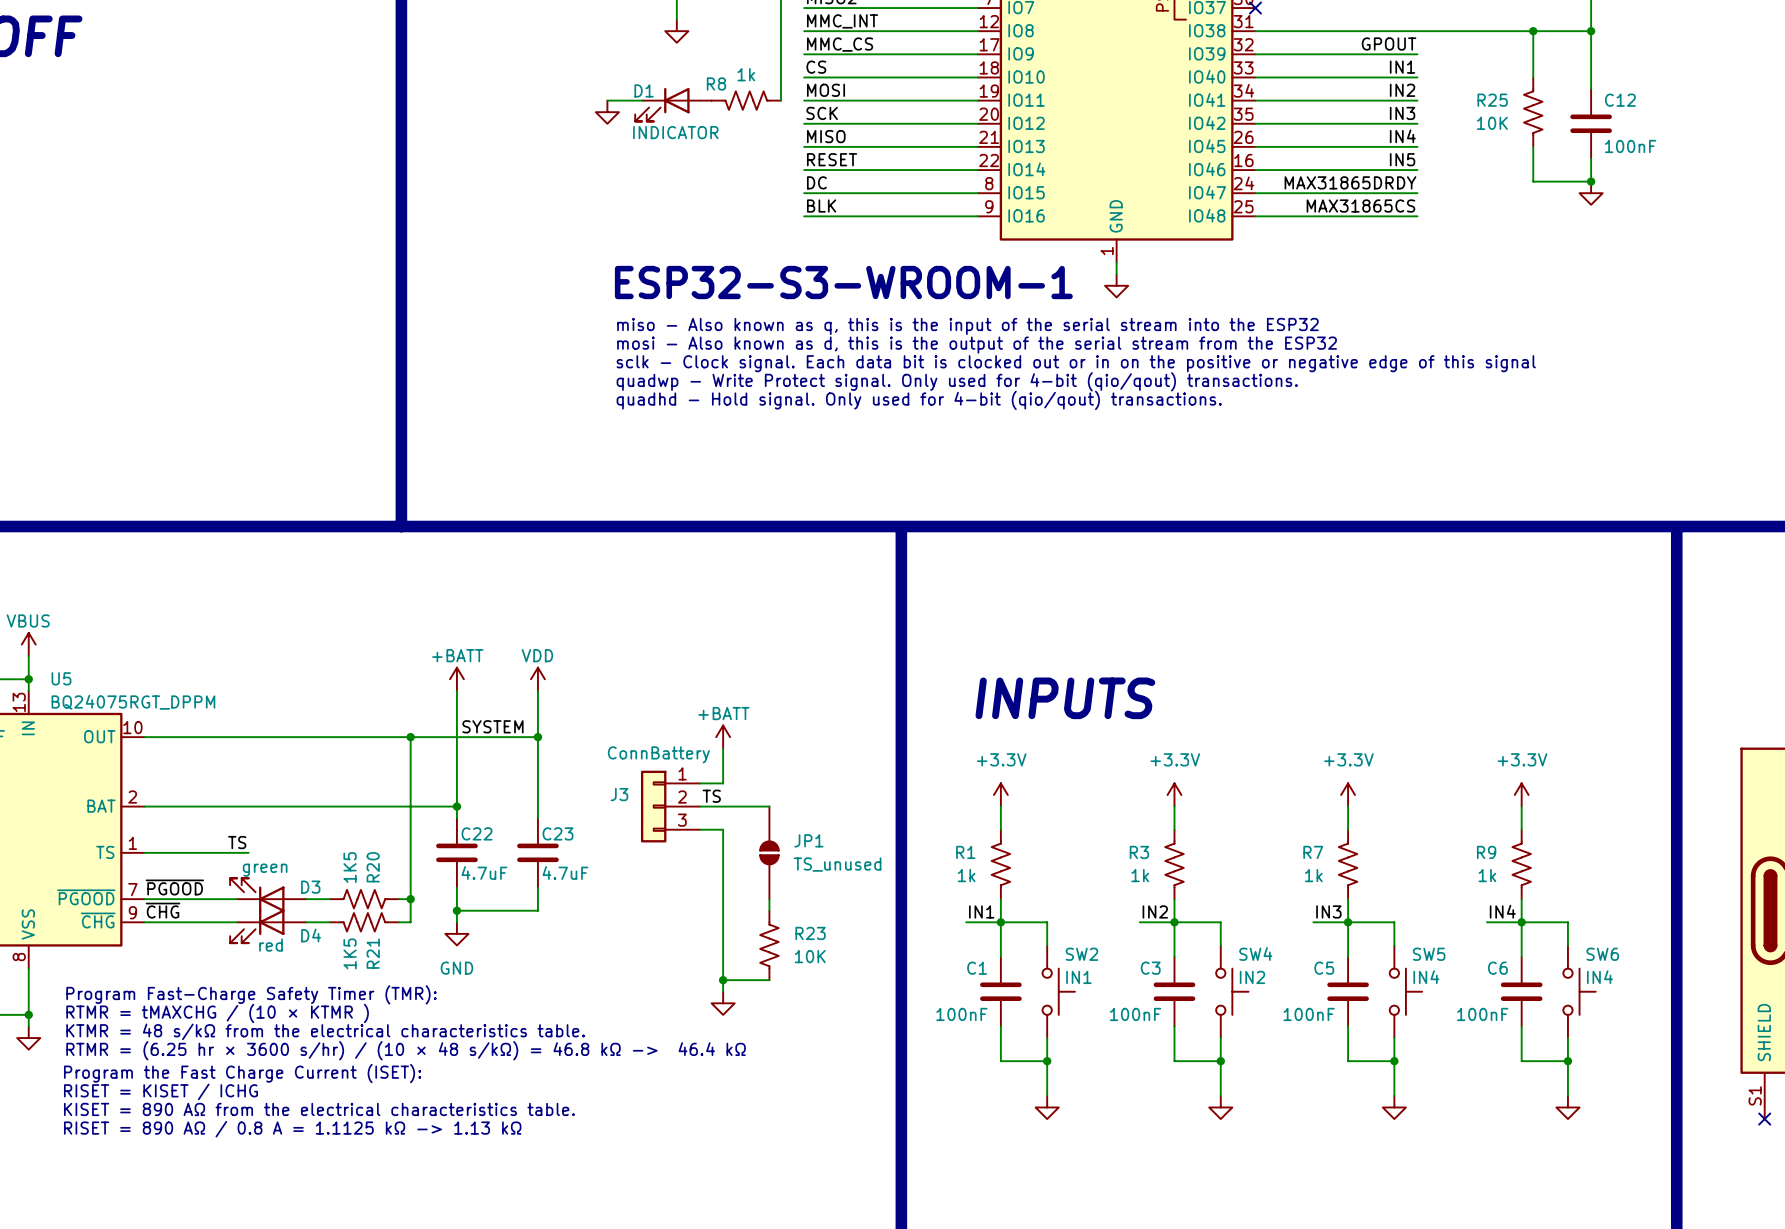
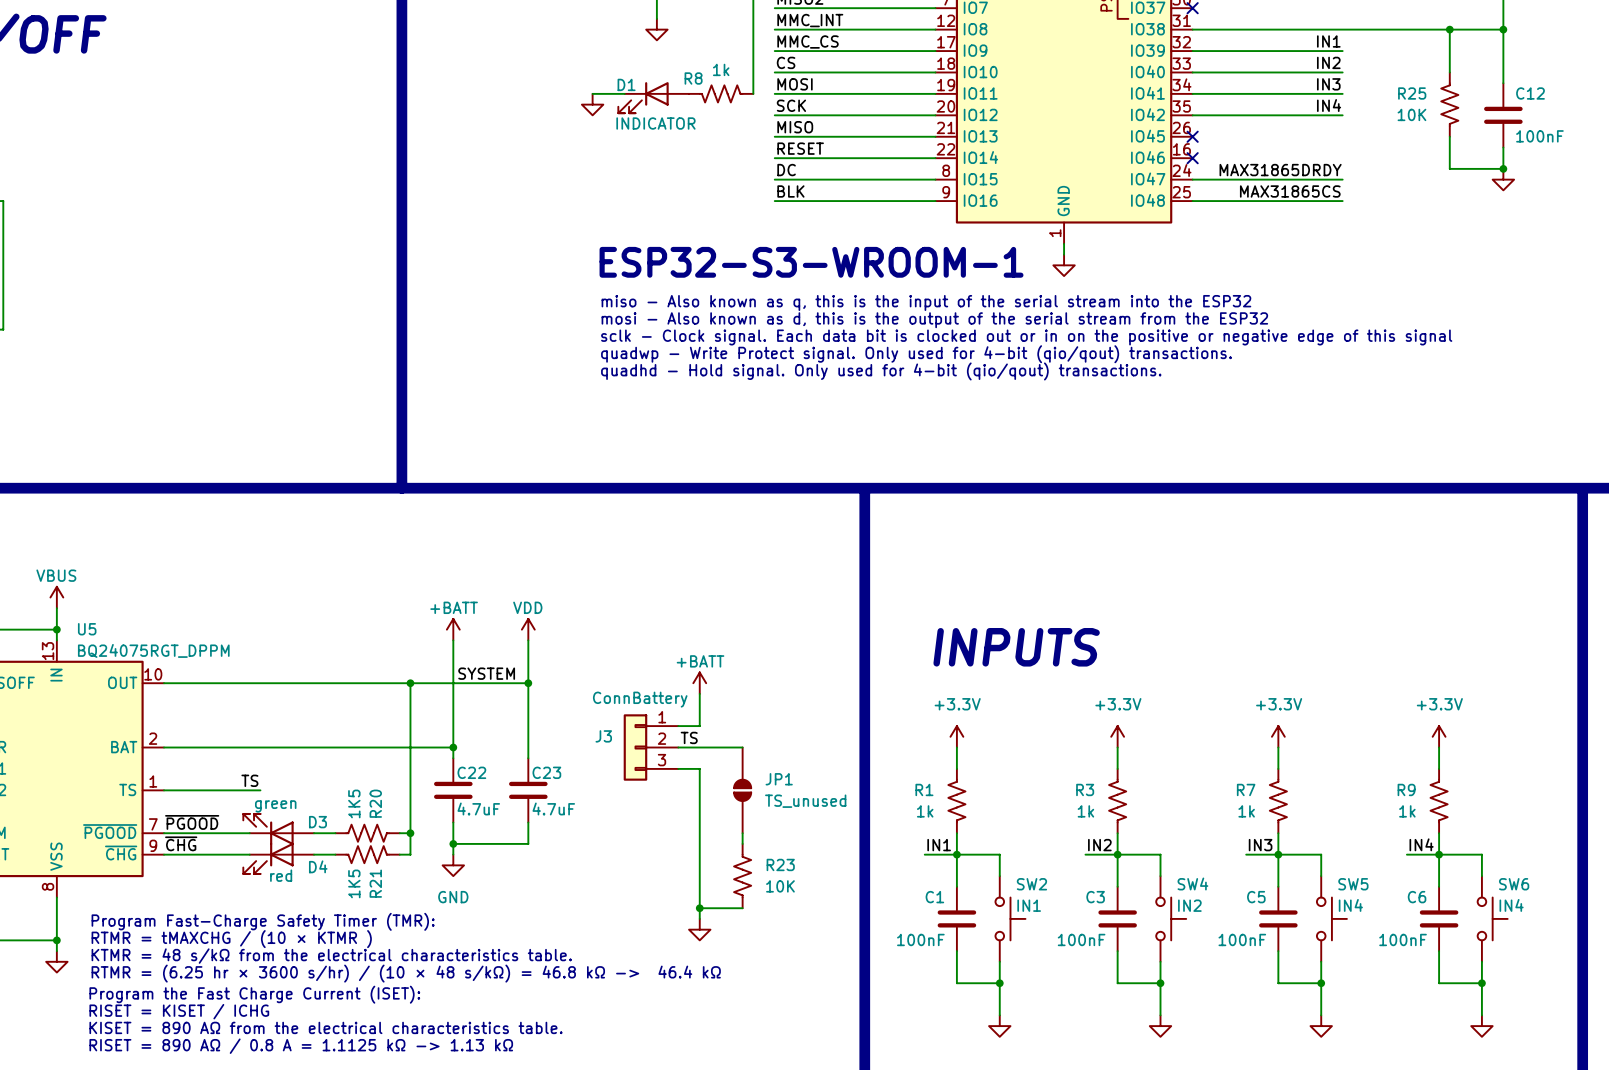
label: GPOUT (1389, 43) -> IN1 (1328, 41)
label: IN1 (1402, 67) -> IN2 (1328, 62)
label: IN2 (1402, 90) -> IN3 (1328, 84)
label: IN3 (1402, 113) -> IN4 (1329, 105)
label: IN4 (1402, 136) -> none
wire: (1255, 146) (1417, 146) -> none
no-connect mark: none -> (1192, 136)
label: IN5 (1402, 159) -> none
wire: (1255, 170) (1417, 170) -> none
no-connect mark: none -> (1192, 158)

